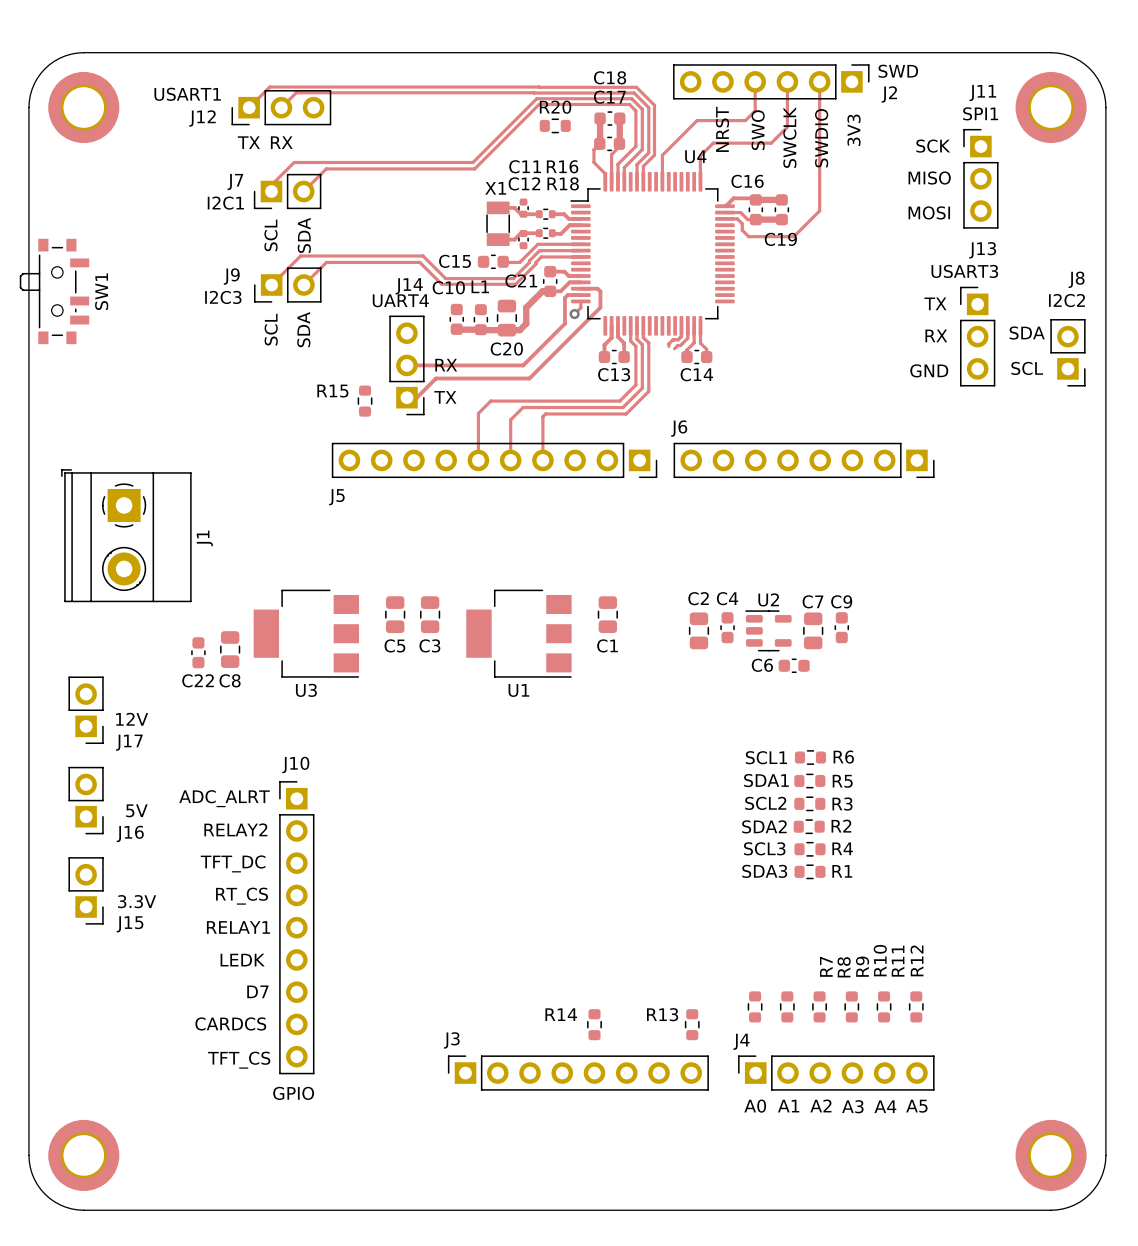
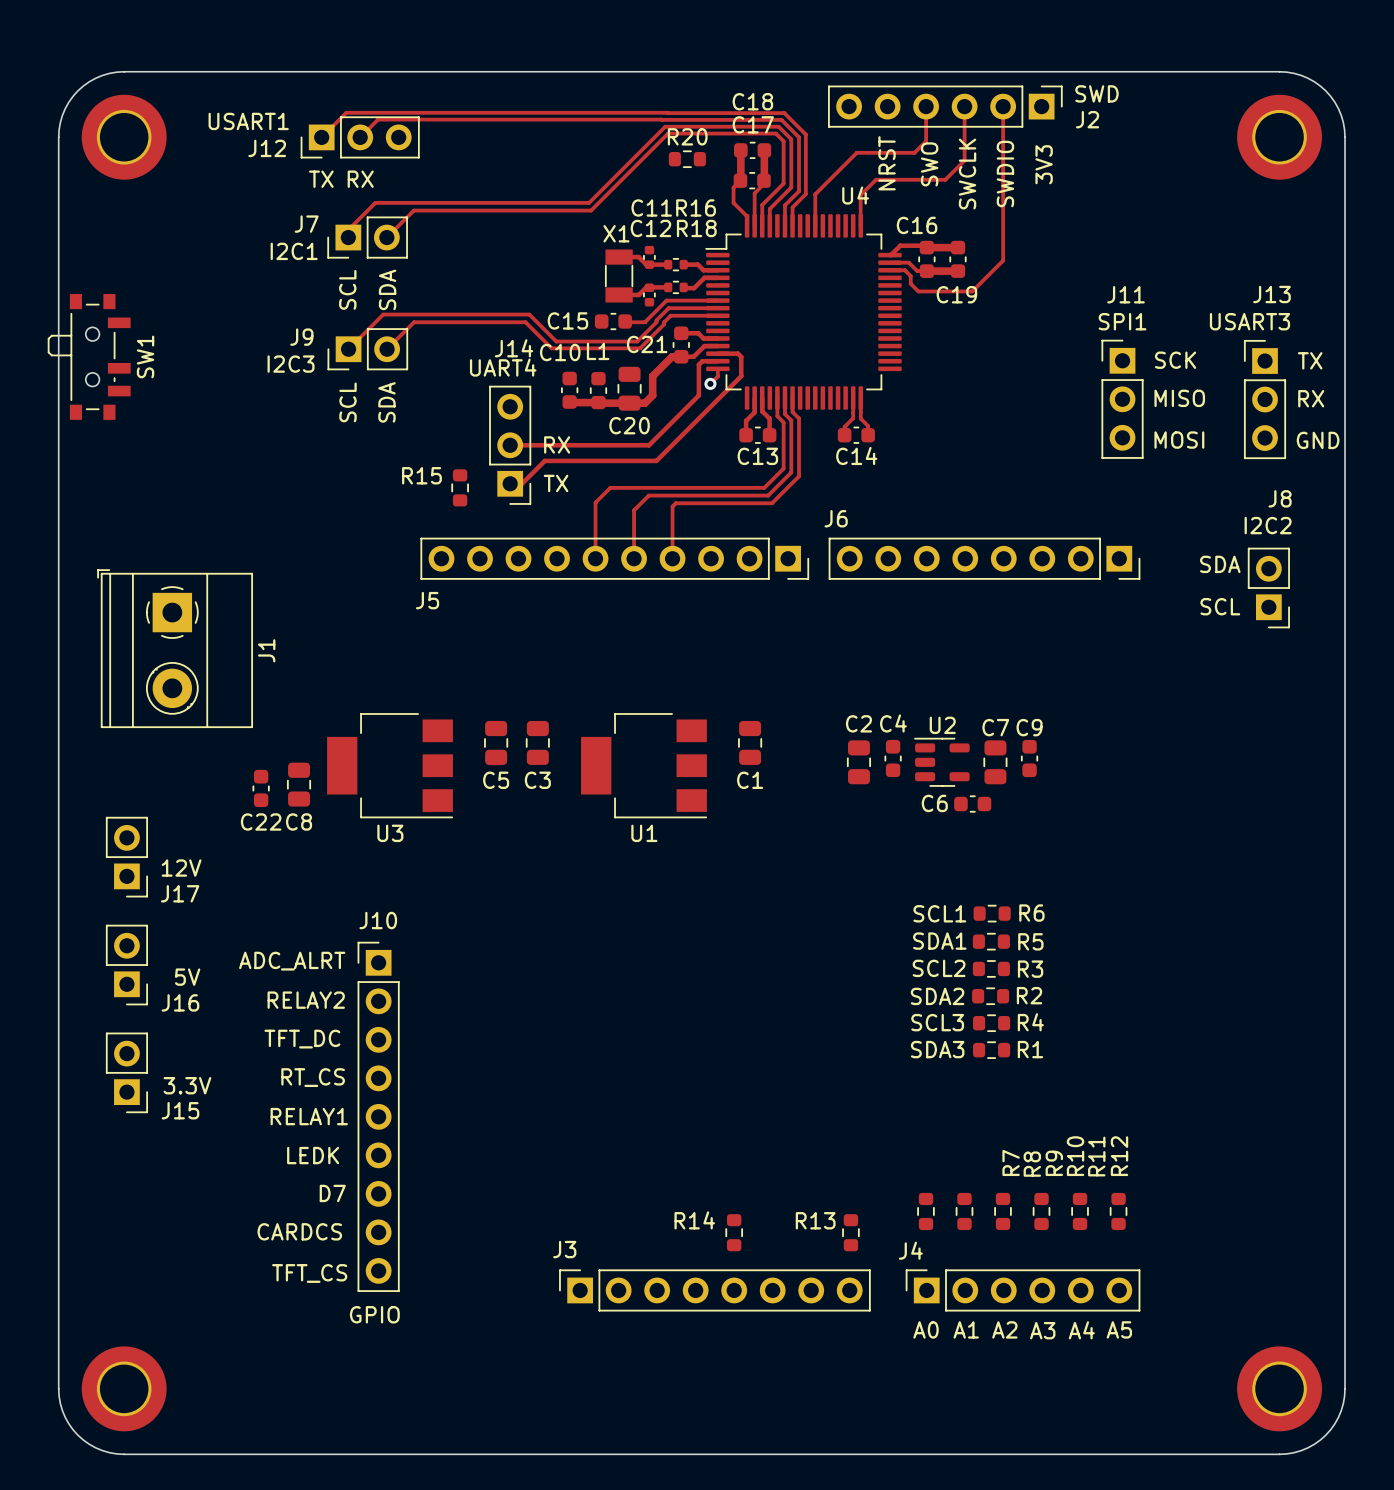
J11 text position: SCK (933, 146) -> SCK (1175, 360)
J11 text position: MISO (929, 178) -> MISO (1179, 398)
J11 position: (980, 178) -> (1122, 399)
J11 text position: MOSI (929, 212) -> MOSI (1179, 440)
J13 text position: TX (935, 303) -> TX (1310, 360)
track: (681, 325) (681, 336) (678, 339) (672, 339) (668, 346) -> none
track: (687, 325) (687, 338) (674, 348) -> none
J13 text position: RX (936, 335) -> RX (1311, 398)
J13 position: (977, 336) -> (1265, 399)
J8 position: (1067, 352) -> (1268, 588)
J13 text position: GND (929, 370) -> GND (1318, 440)

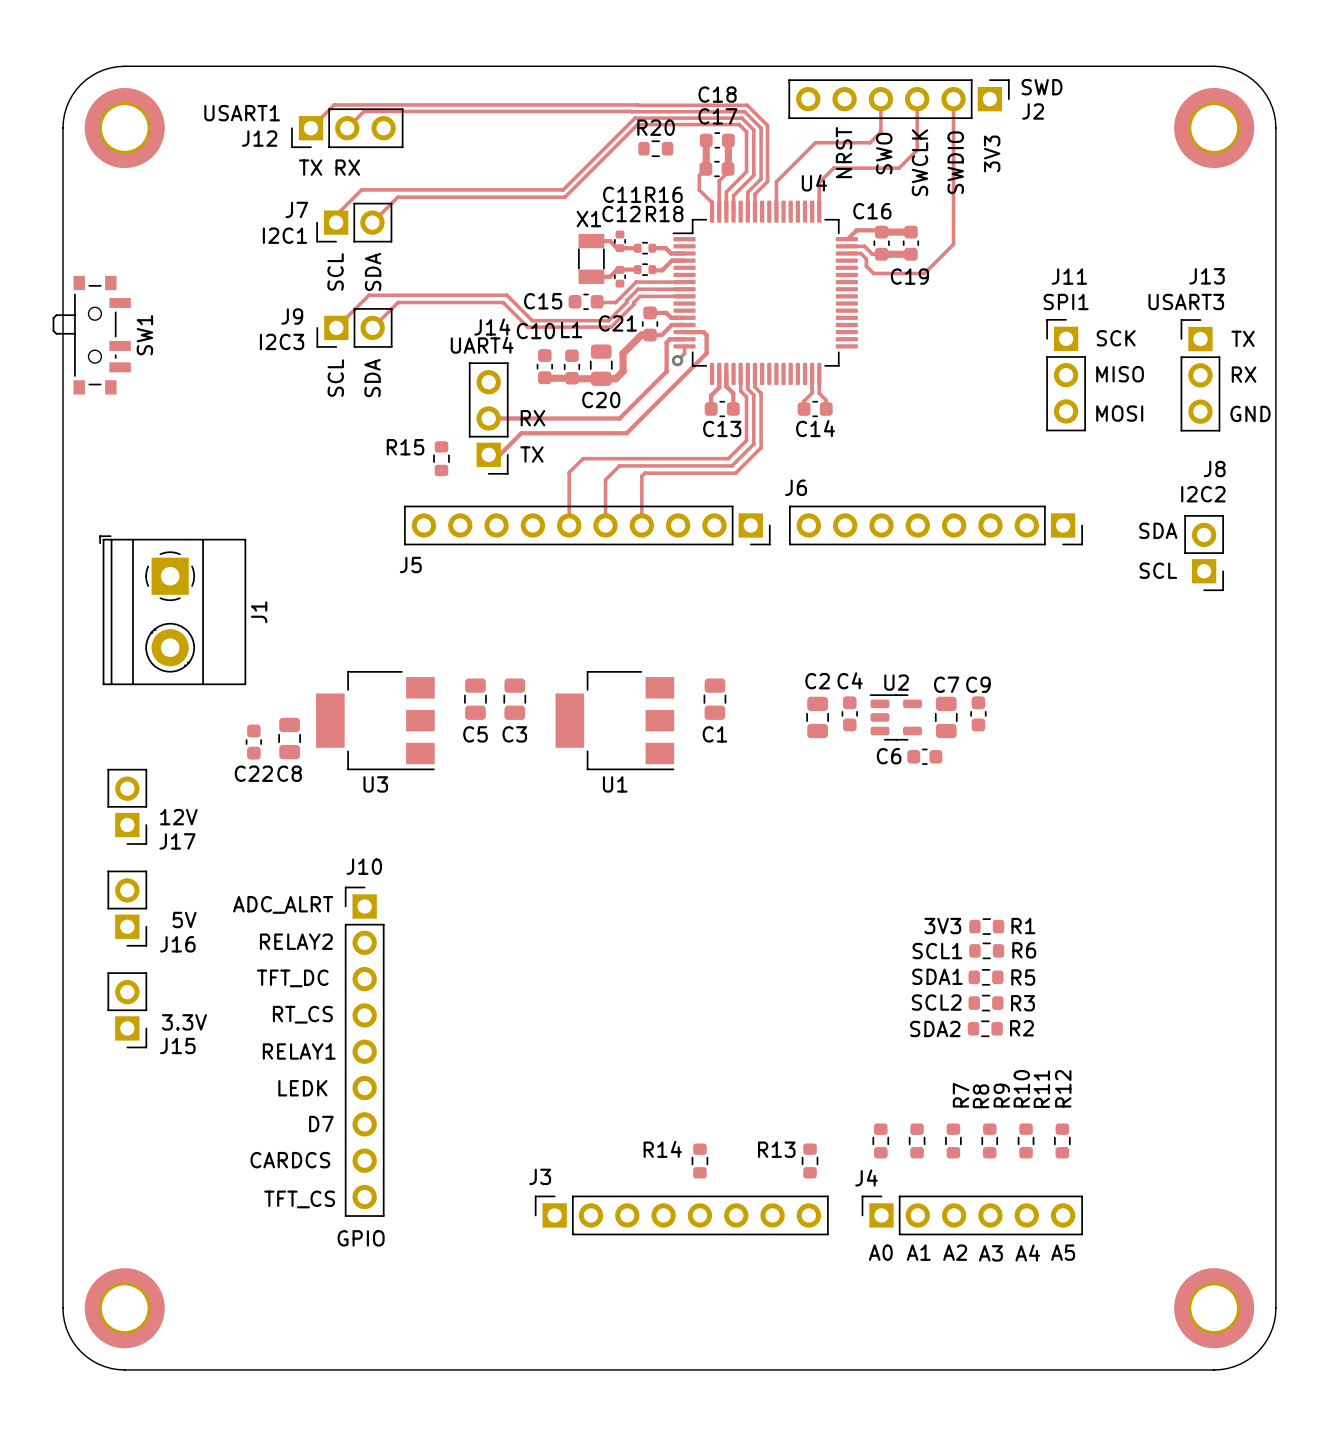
R6 position: (992, 913) -> (986, 950)
R5 position: (991, 941) -> (986, 977)
R3 position: (991, 968) -> (986, 1003)
R1 text: none -> 3V3 (942, 926)
R2 position: (990, 996) -> (985, 1028)
R4: (991, 1023) -> none
R1 text: SDA3 (937, 1049) -> none
R1 position: (991, 1050) -> (986, 926)

